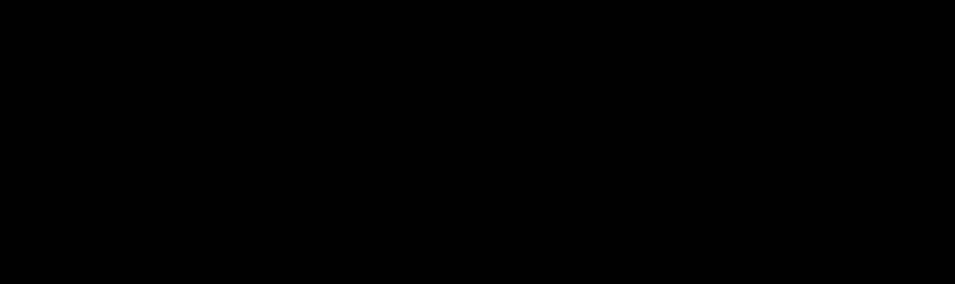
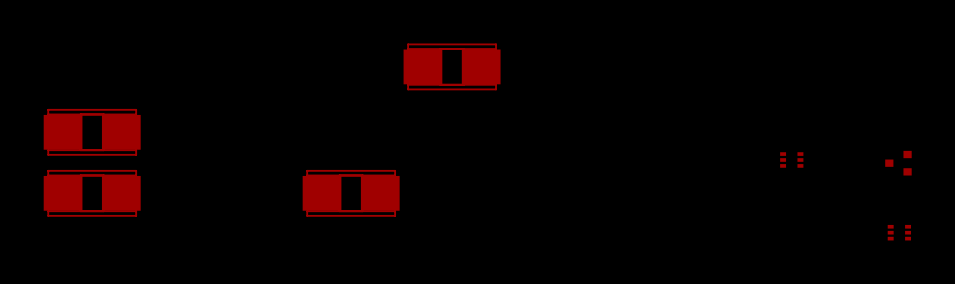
part: none -> (452, 66)
part: none -> (92, 132)
part: none -> (791, 159)
part: none -> (898, 163)
part: none -> (92, 193)
part: none -> (351, 193)
part: none -> (899, 232)

